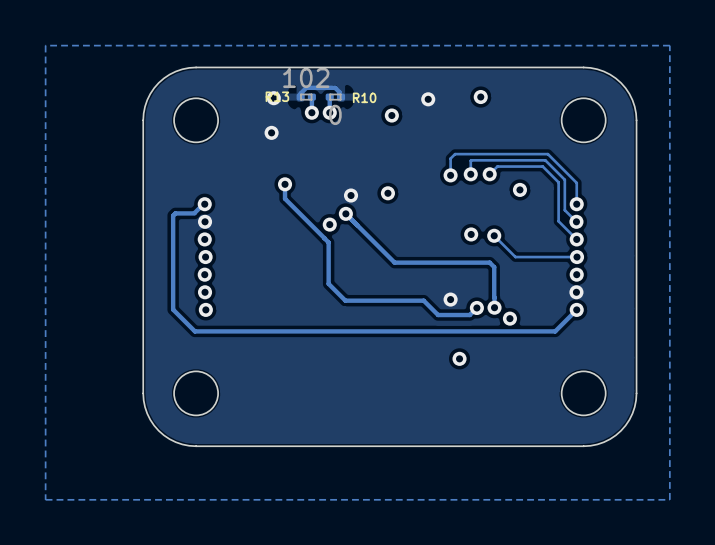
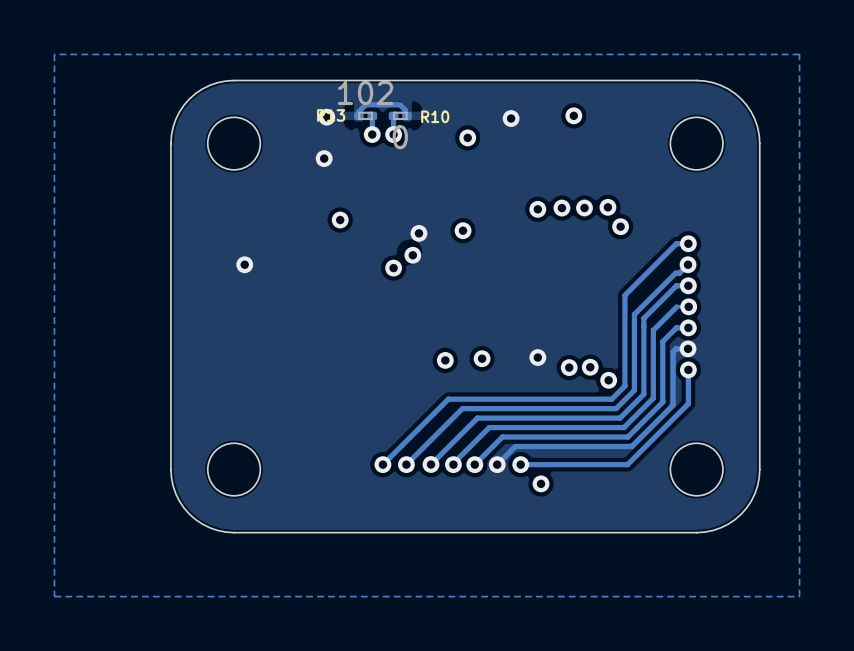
via: none -> (607, 207)
track: (470, 174) (471, 160) (545, 160) (564, 179) (564, 210) (576, 221) -> (406, 464) (462, 408) (616, 408) (634, 390) (634, 314) (675, 273) (679, 273) (688, 264)
track: (489, 174) (497, 166) (542, 166) (558, 182) (558, 221) (576, 239) -> (431, 464) (477, 418) (620, 418) (643, 394) (643, 318) (676, 285) (688, 285)
track: (450, 175) (450, 158) (455, 154) (547, 154) (576, 182) (576, 204) -> (382, 464) (448, 399) (611, 399) (624, 386) (624, 295) (676, 243) (688, 243)
track: (285, 184) (285, 198) (324, 238) -> none
via: (204, 204) -> none
track: (201, 205) (194, 212) -> none
track: (343, 211) (394, 262) (489, 262) (494, 267) (494, 307) -> none
track: (194, 213) (175, 213) (173, 215) (173, 309) (194, 331) (555, 331) (576, 309) -> (520, 464) (627, 464) (688, 403) (688, 369)
via: (471, 234) -> none
track: (494, 235) (515, 257) (567, 257) -> (453, 464) (451, 465) (489, 427) (623, 427) (653, 398) (653, 330) (676, 306)
via: (494, 235) -> none
track: (324, 238) (328, 242) (328, 283) (345, 300) (423, 300) (438, 315) (469, 315) (476, 307) -> none
via: (204, 239) -> none
via: (205, 257) -> none
via: (204, 274) -> none
track: none -> (688, 327) (676, 327) (662, 341) (662, 402) (627, 437) (502, 437) (474, 464)
via: (205, 292) -> none
track: none -> (688, 348) (676, 348) (673, 351) (673, 405) (631, 446) (515, 446) (497, 464)
via: none -> (482, 358)
via: none -> (445, 360)
via: (205, 309) -> none
via: (459, 358) -> none
via: none -> (382, 464)
via: none -> (406, 464)
via: none -> (431, 464)
via: none -> (453, 464)
via: none -> (474, 464)
via: none -> (497, 464)
via: none -> (520, 464)
via: none -> (541, 483)

